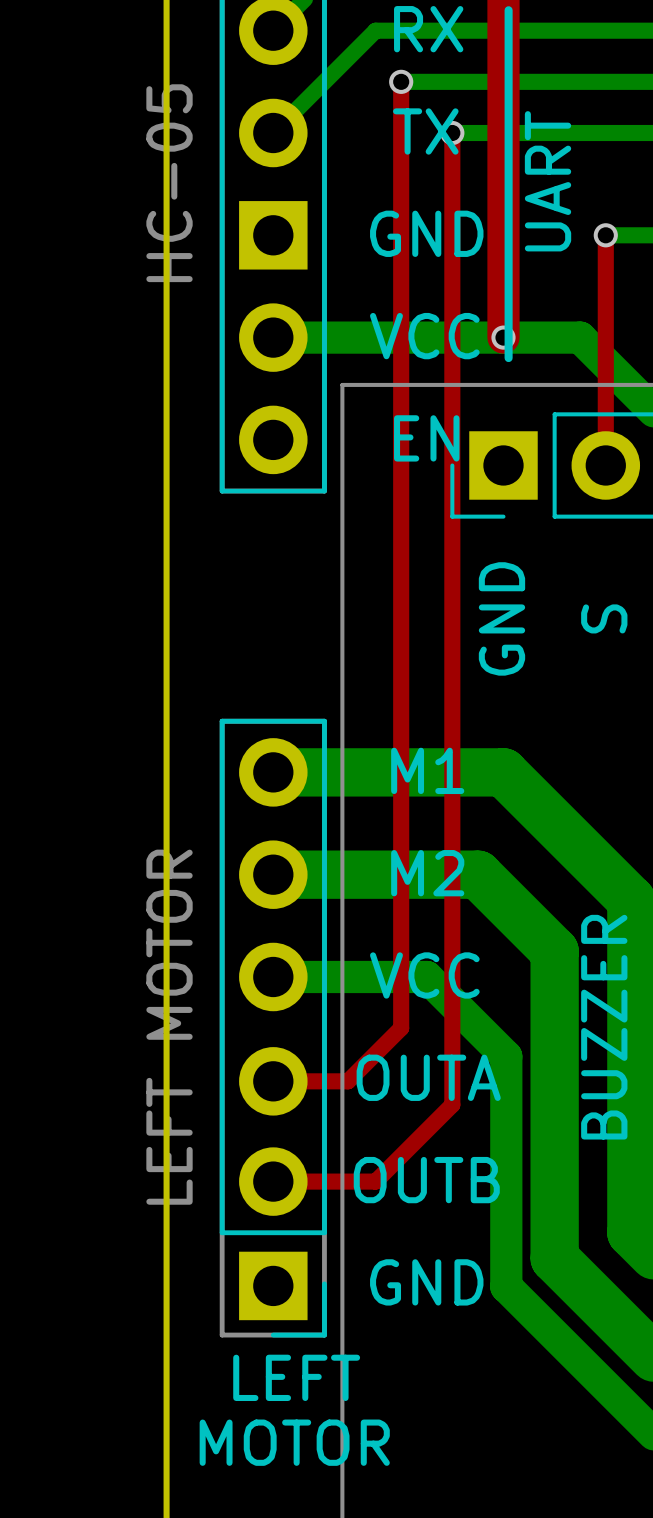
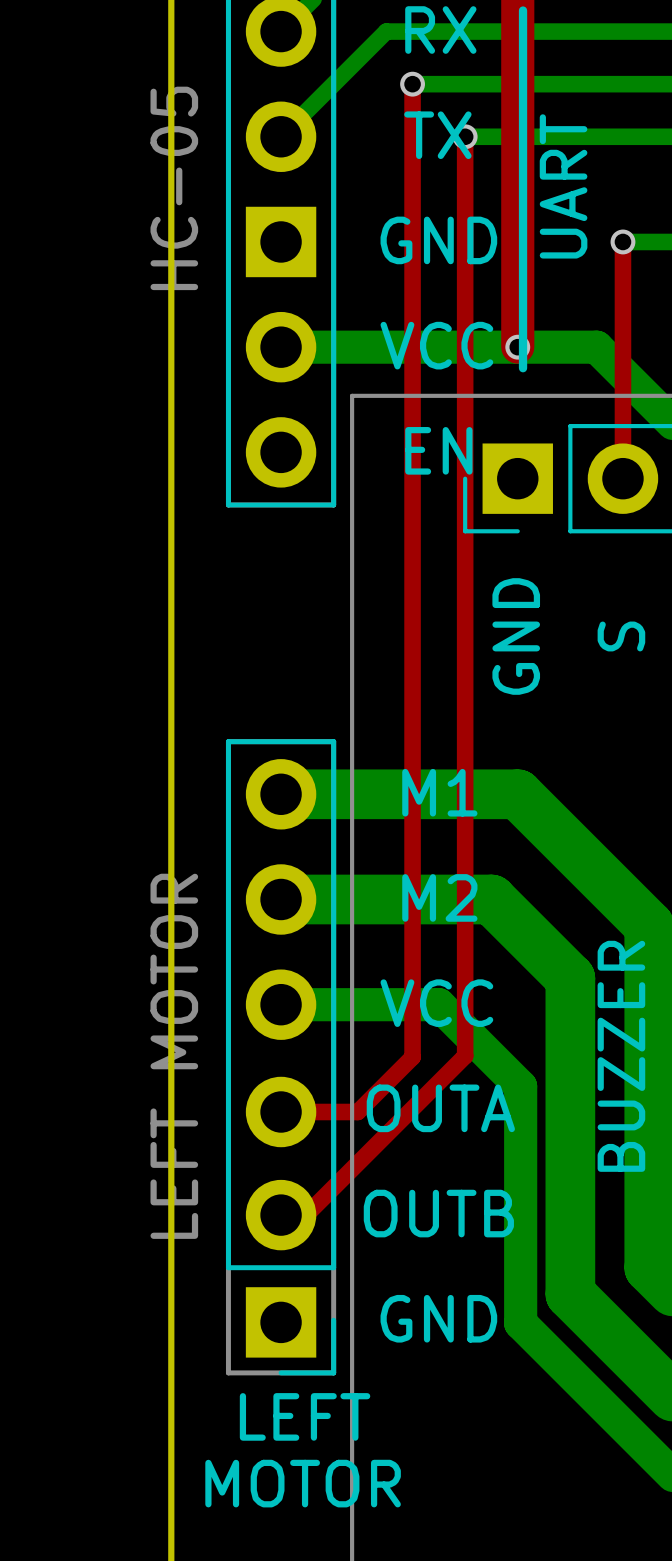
top track: (452, 1026) (452, 1104) (375, 1181) (297, 1181) -> (465, 1056) (306, 1215)

